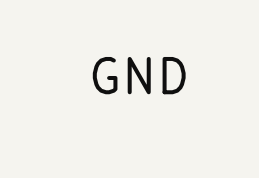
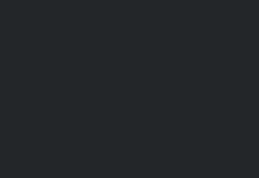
label: GND (139, 75) -> none

